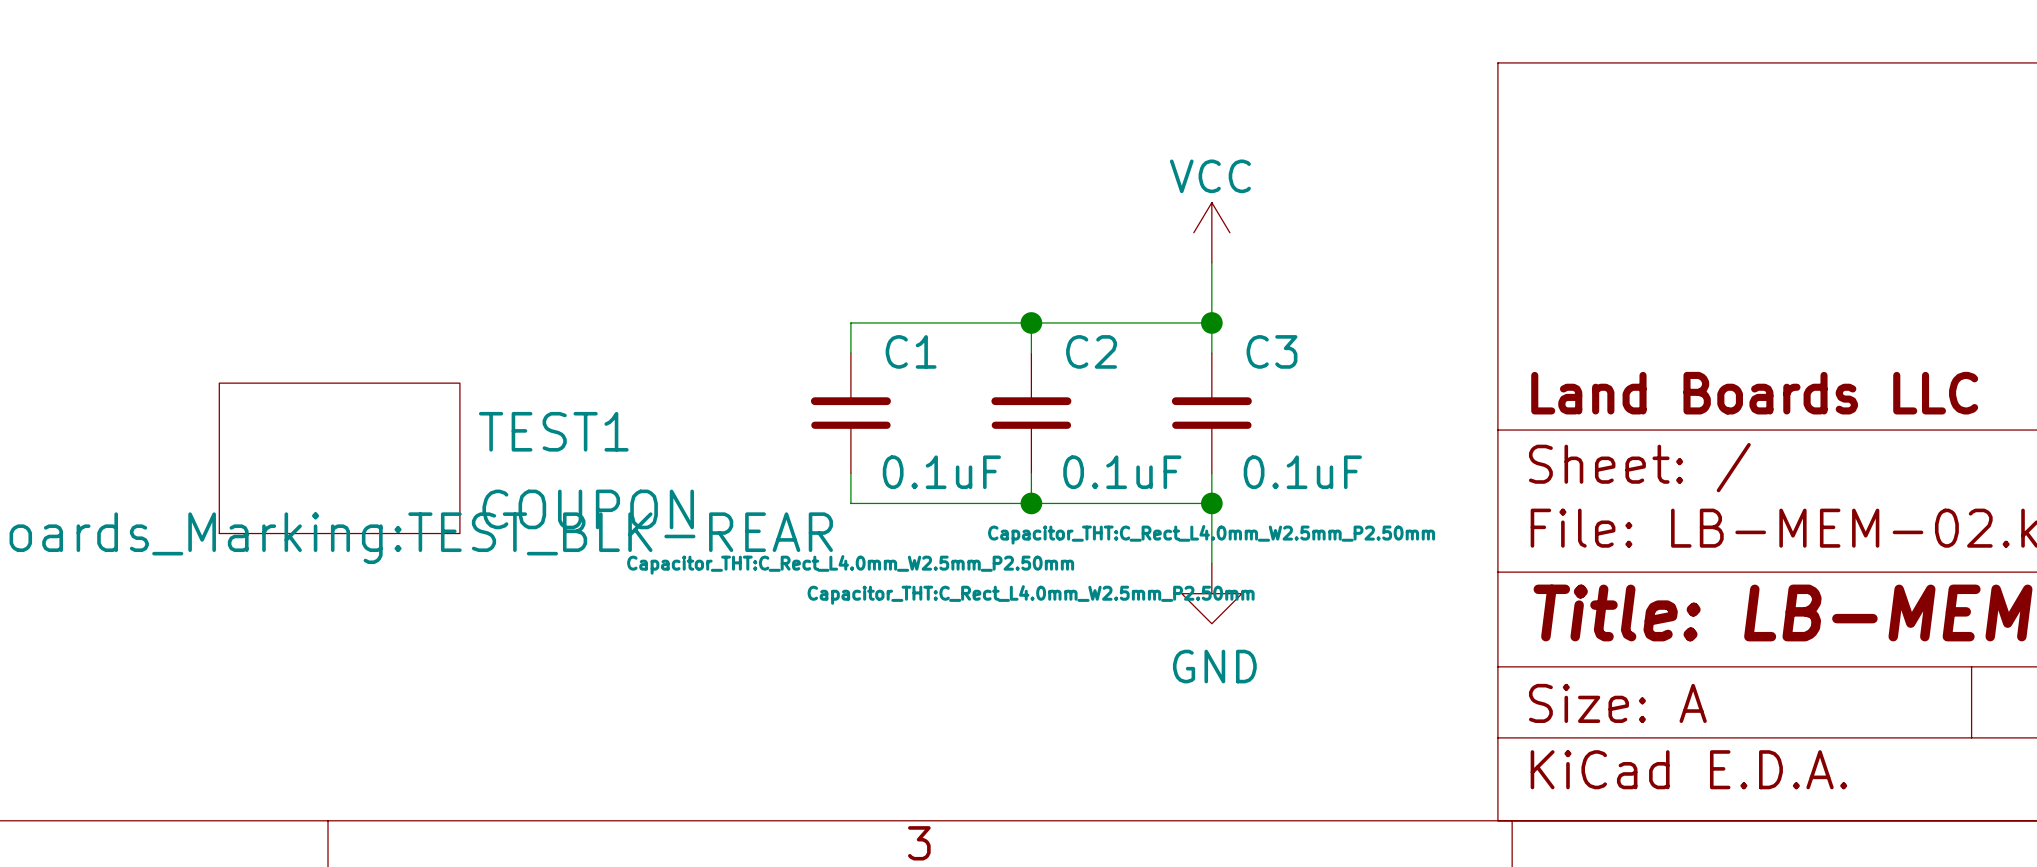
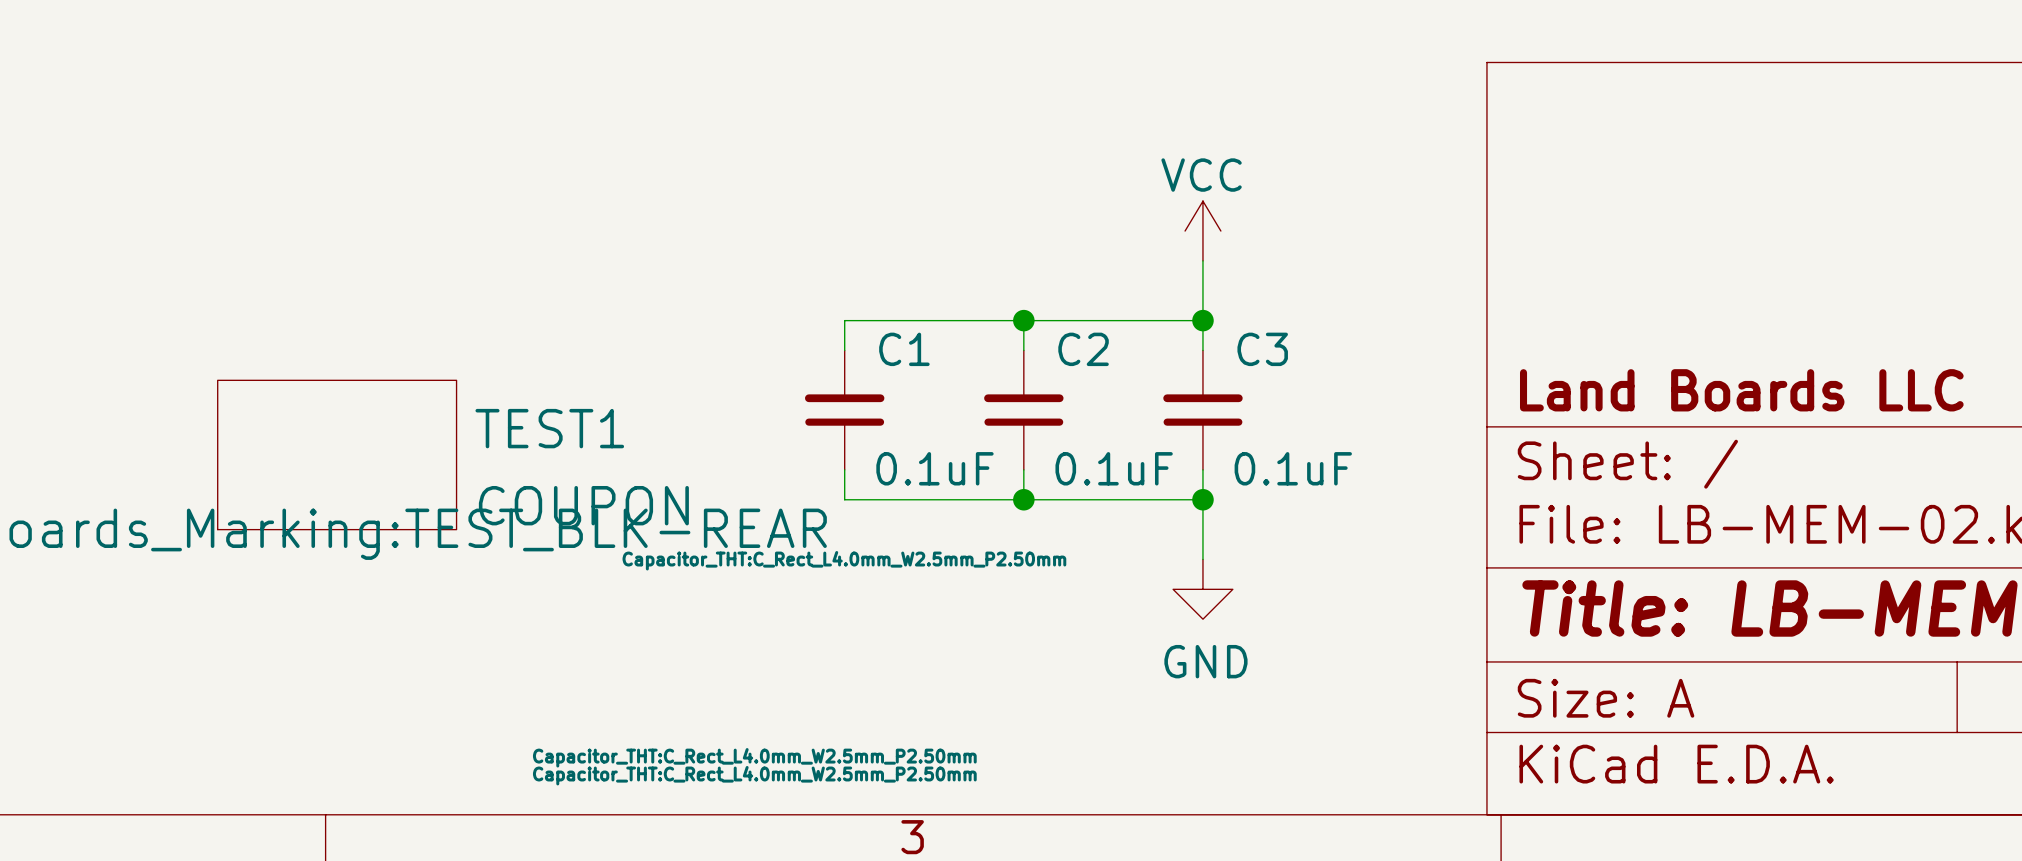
C3 text position: Capacitor_THT:C_Rect_L4.0mm_W2.5mm_P2.50mm (1211, 534) -> Capacitor_THT:C_Rect_L4.0mm_W2.5mm_P2.50mm (754, 757)
C2 text position: Capacitor_THT:C_Rect_L4.0mm_W2.5mm_P2.50mm (1031, 594) -> Capacitor_THT:C_Rect_L4.0mm_W2.5mm_P2.50mm (754, 775)

